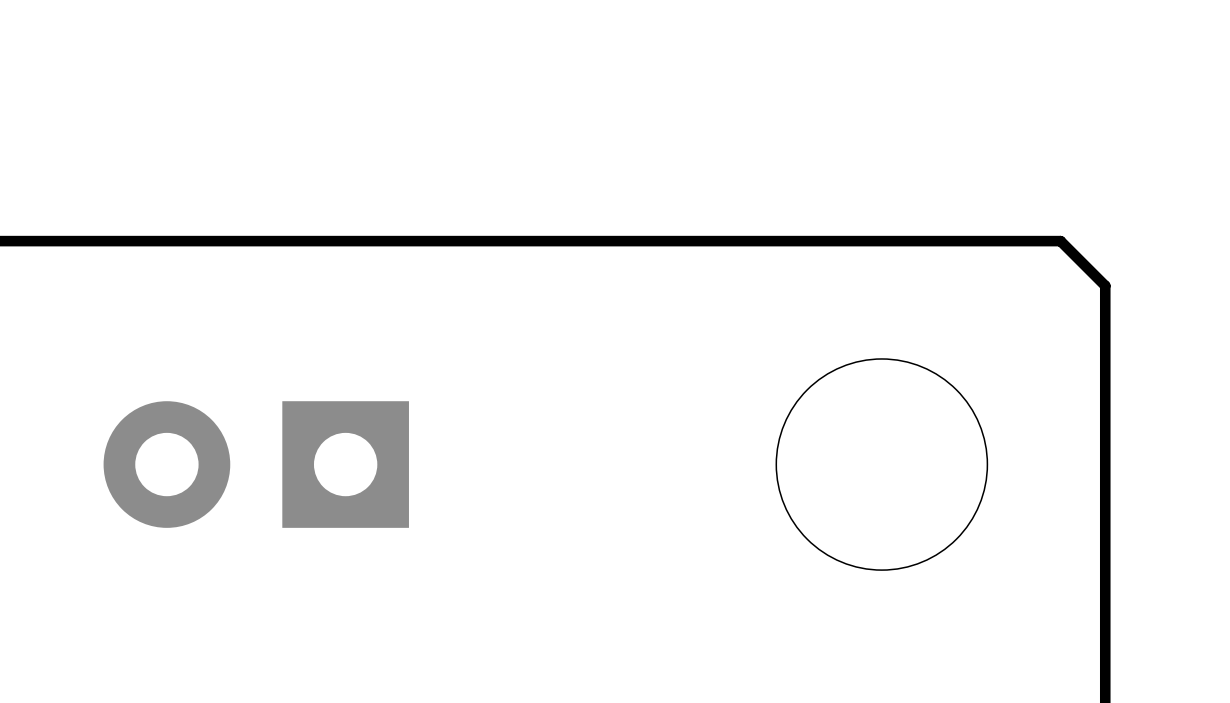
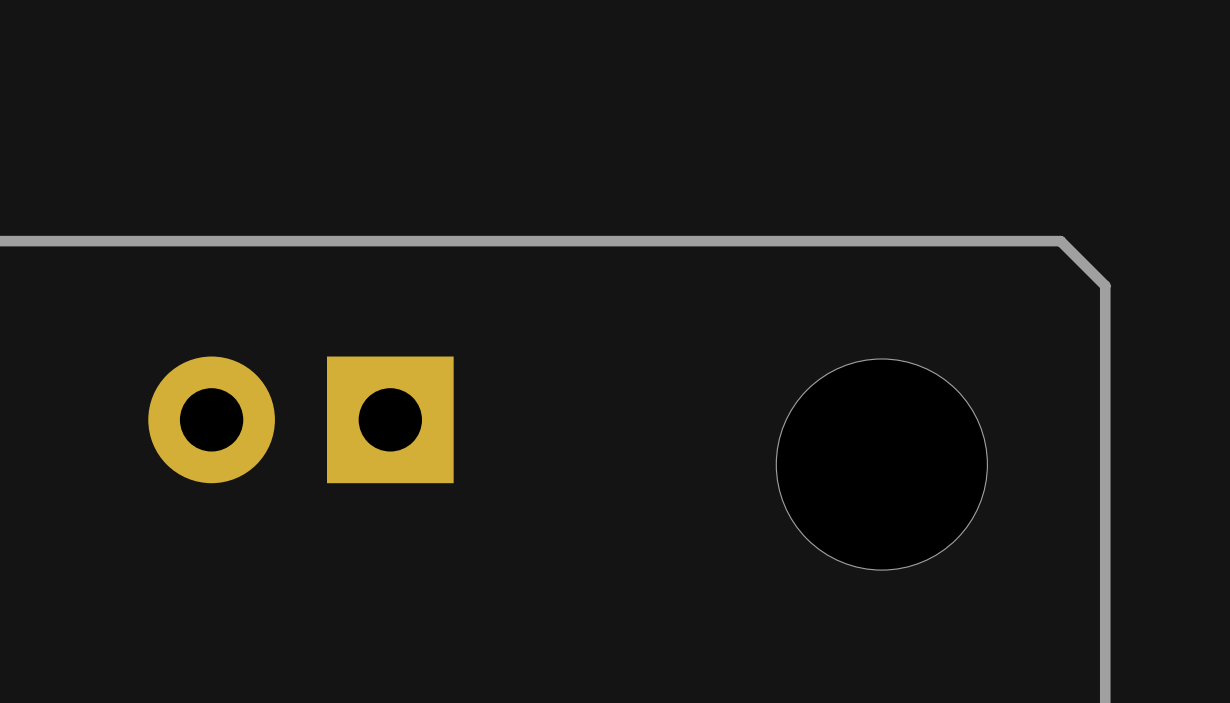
part position: (256, 464) -> (300, 419)

